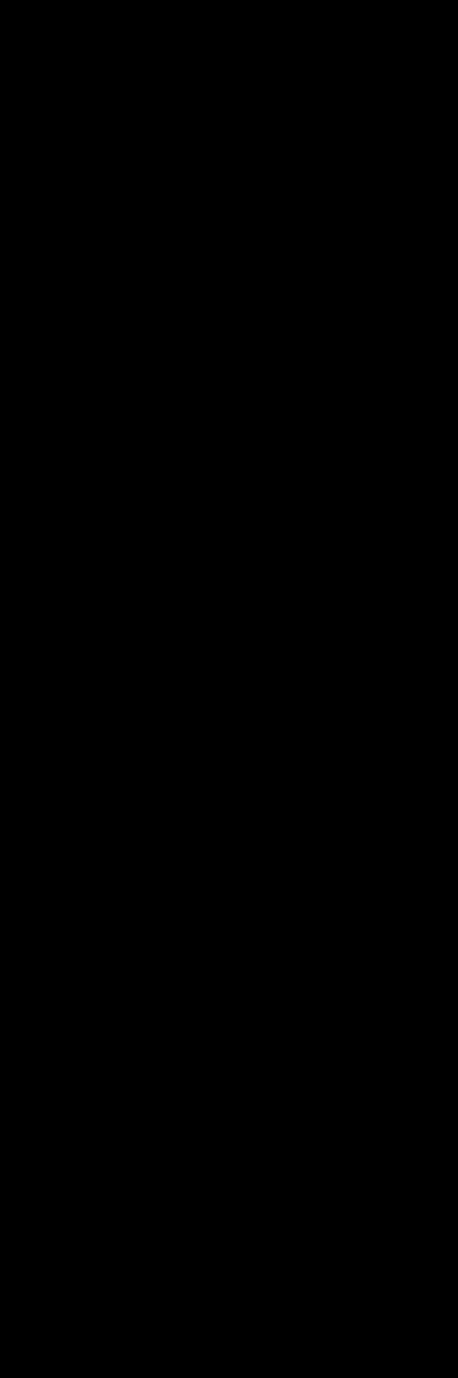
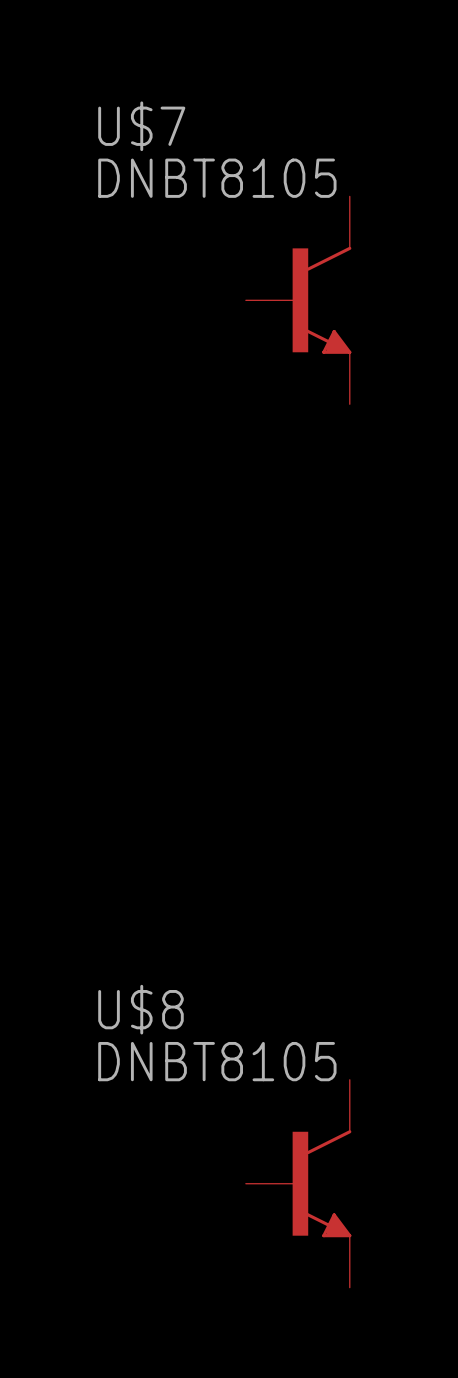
U$7: none -> DNBT8105 (298, 300)
U$8: none -> DNBT8105 (298, 1183)

